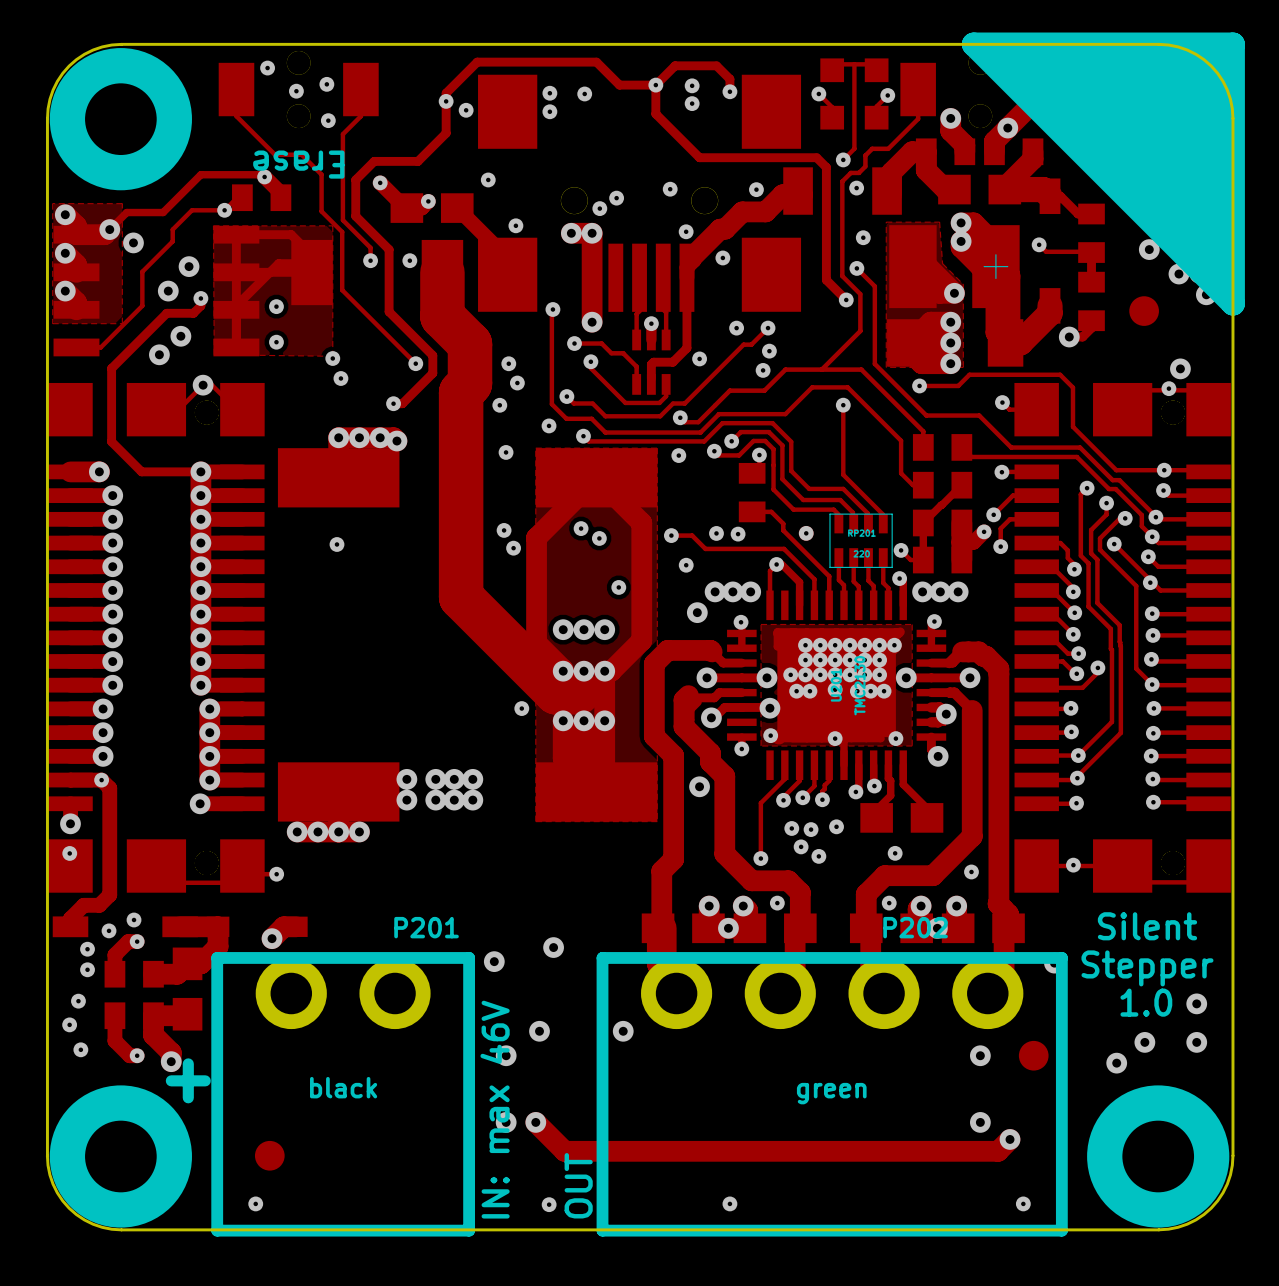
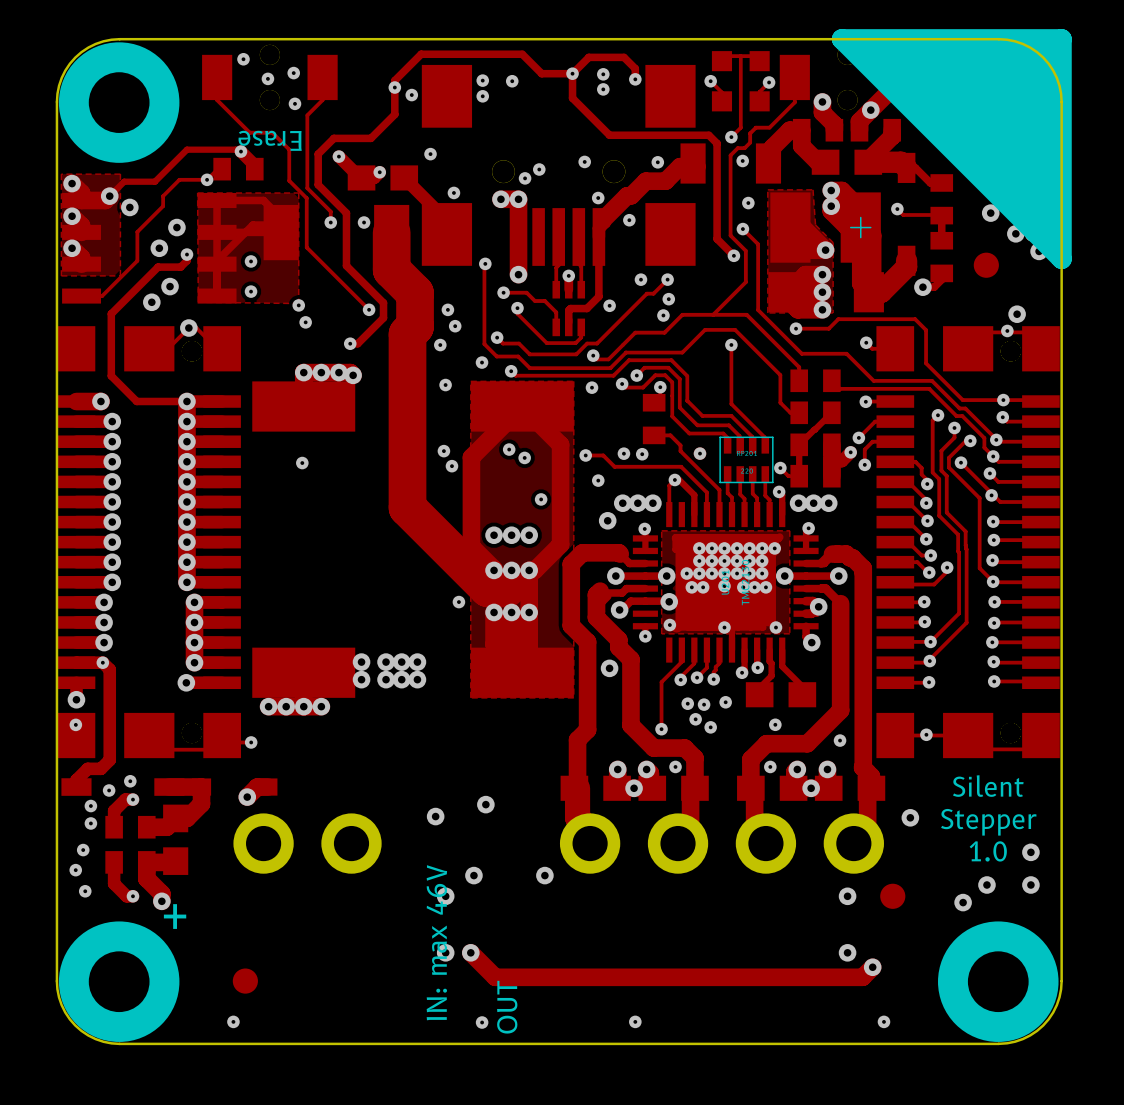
part: none -> (307, 843)
part: none -> (721, 843)
P201: black (343, 1094) -> none
P202: green (832, 1094) -> none

